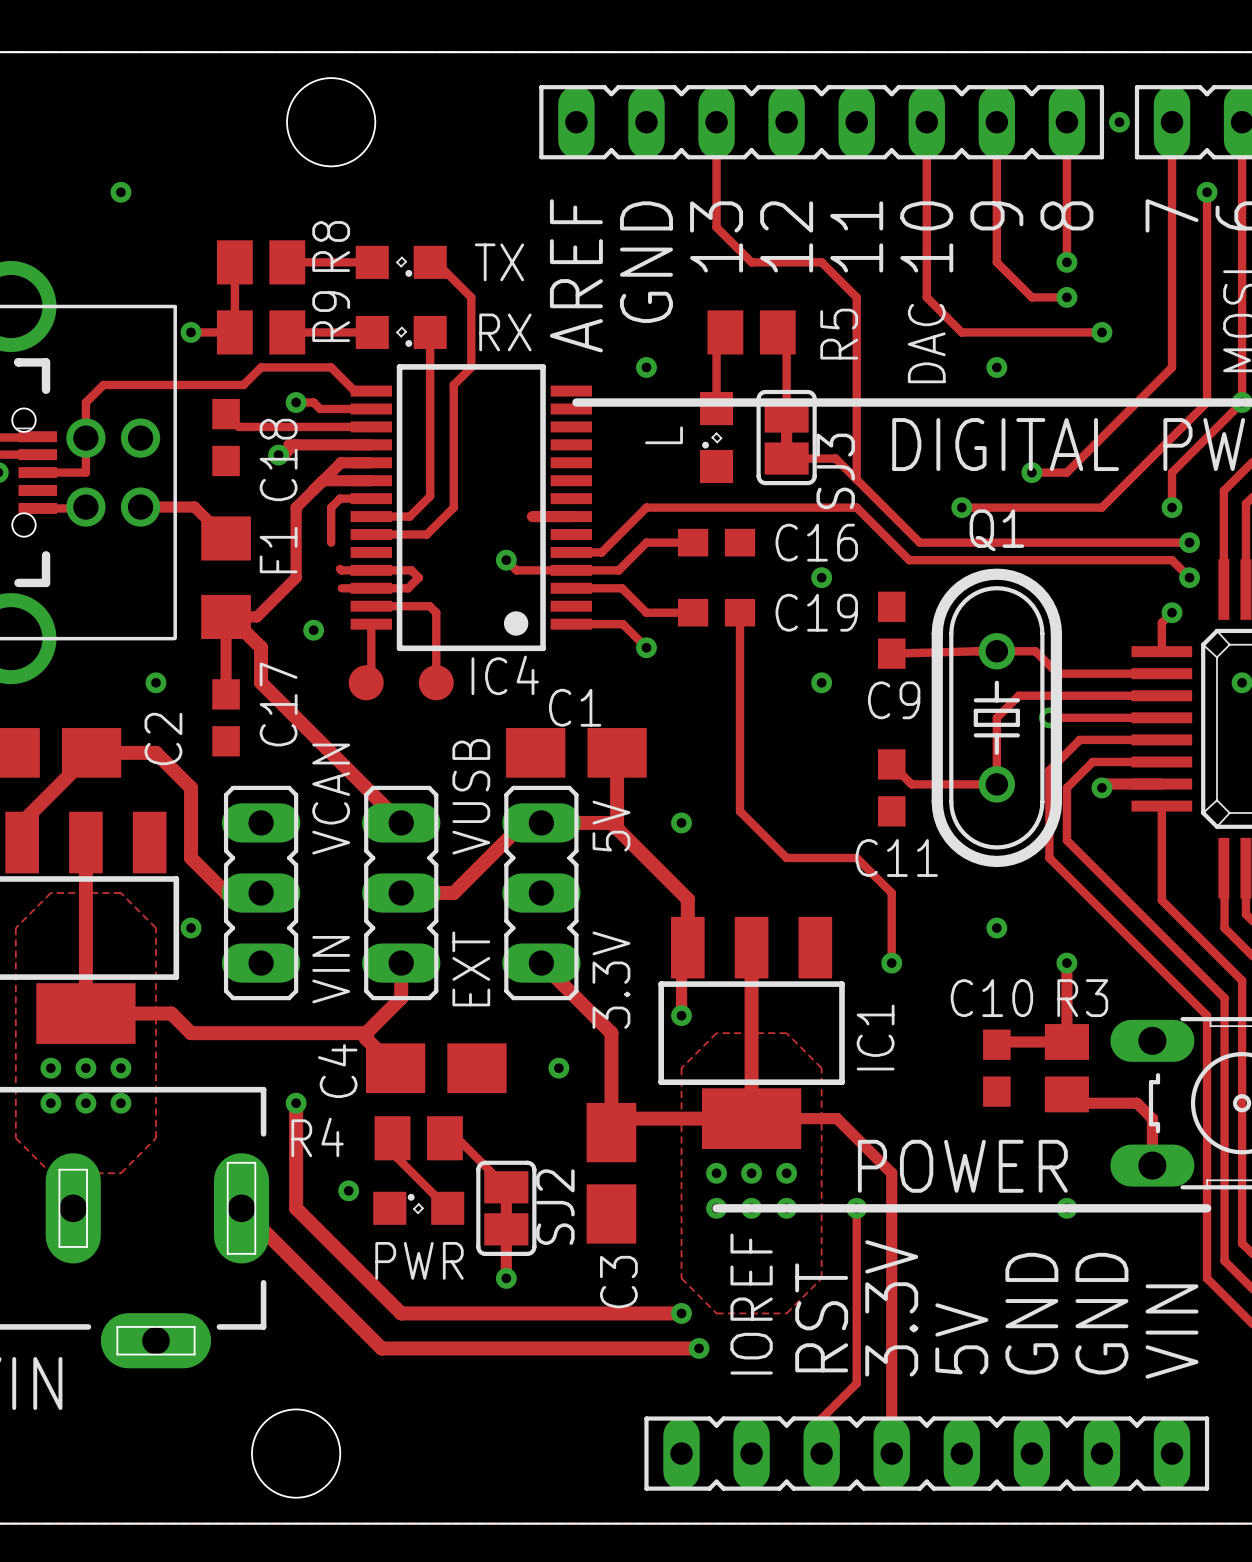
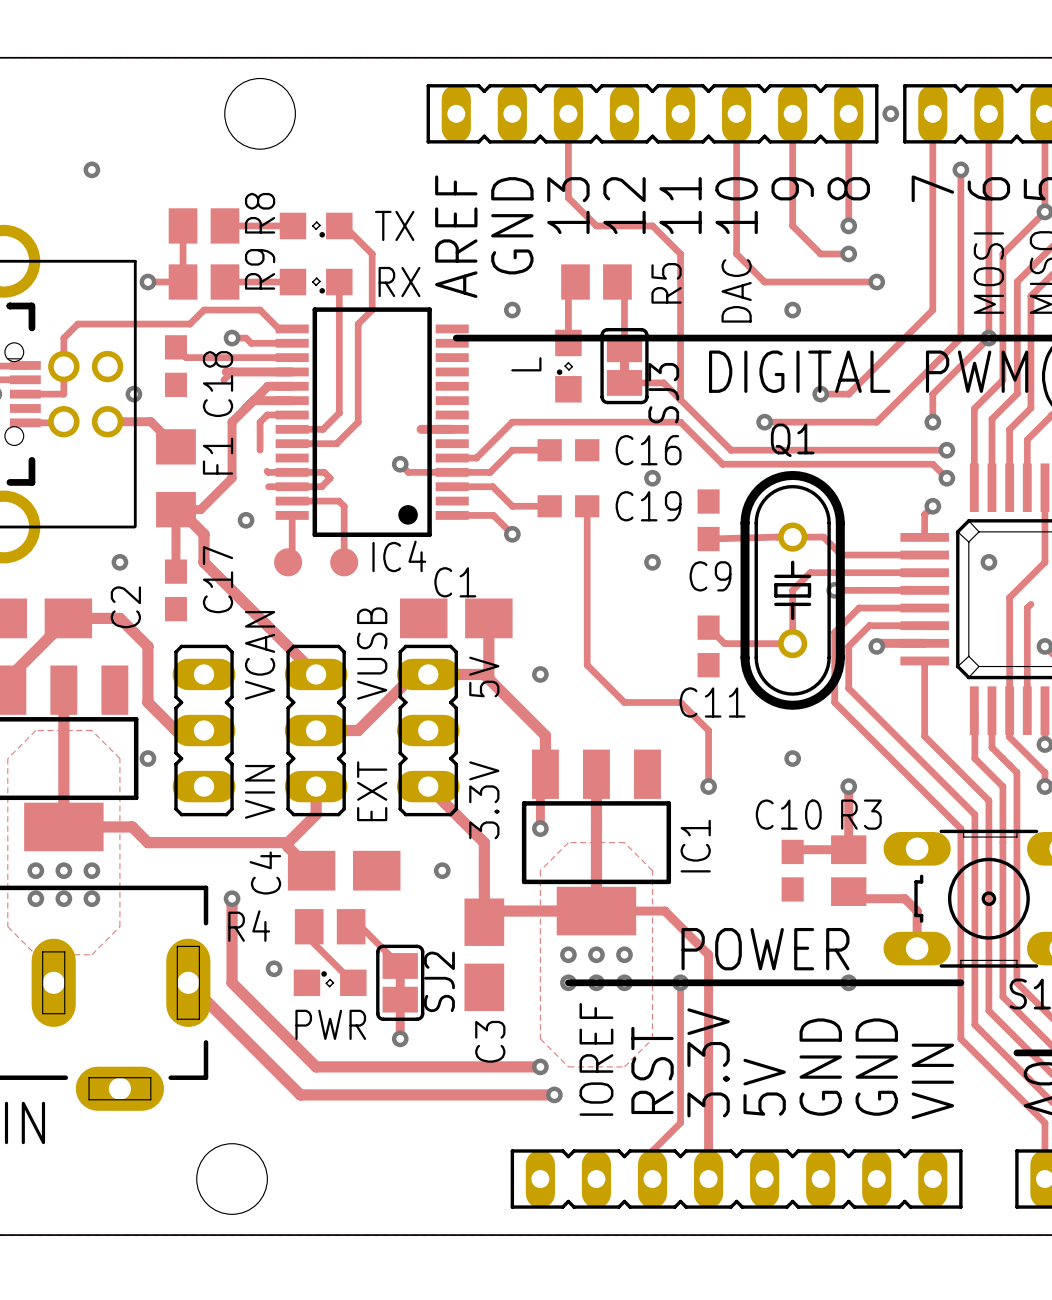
via position: (278, 455) -> (133, 394)

